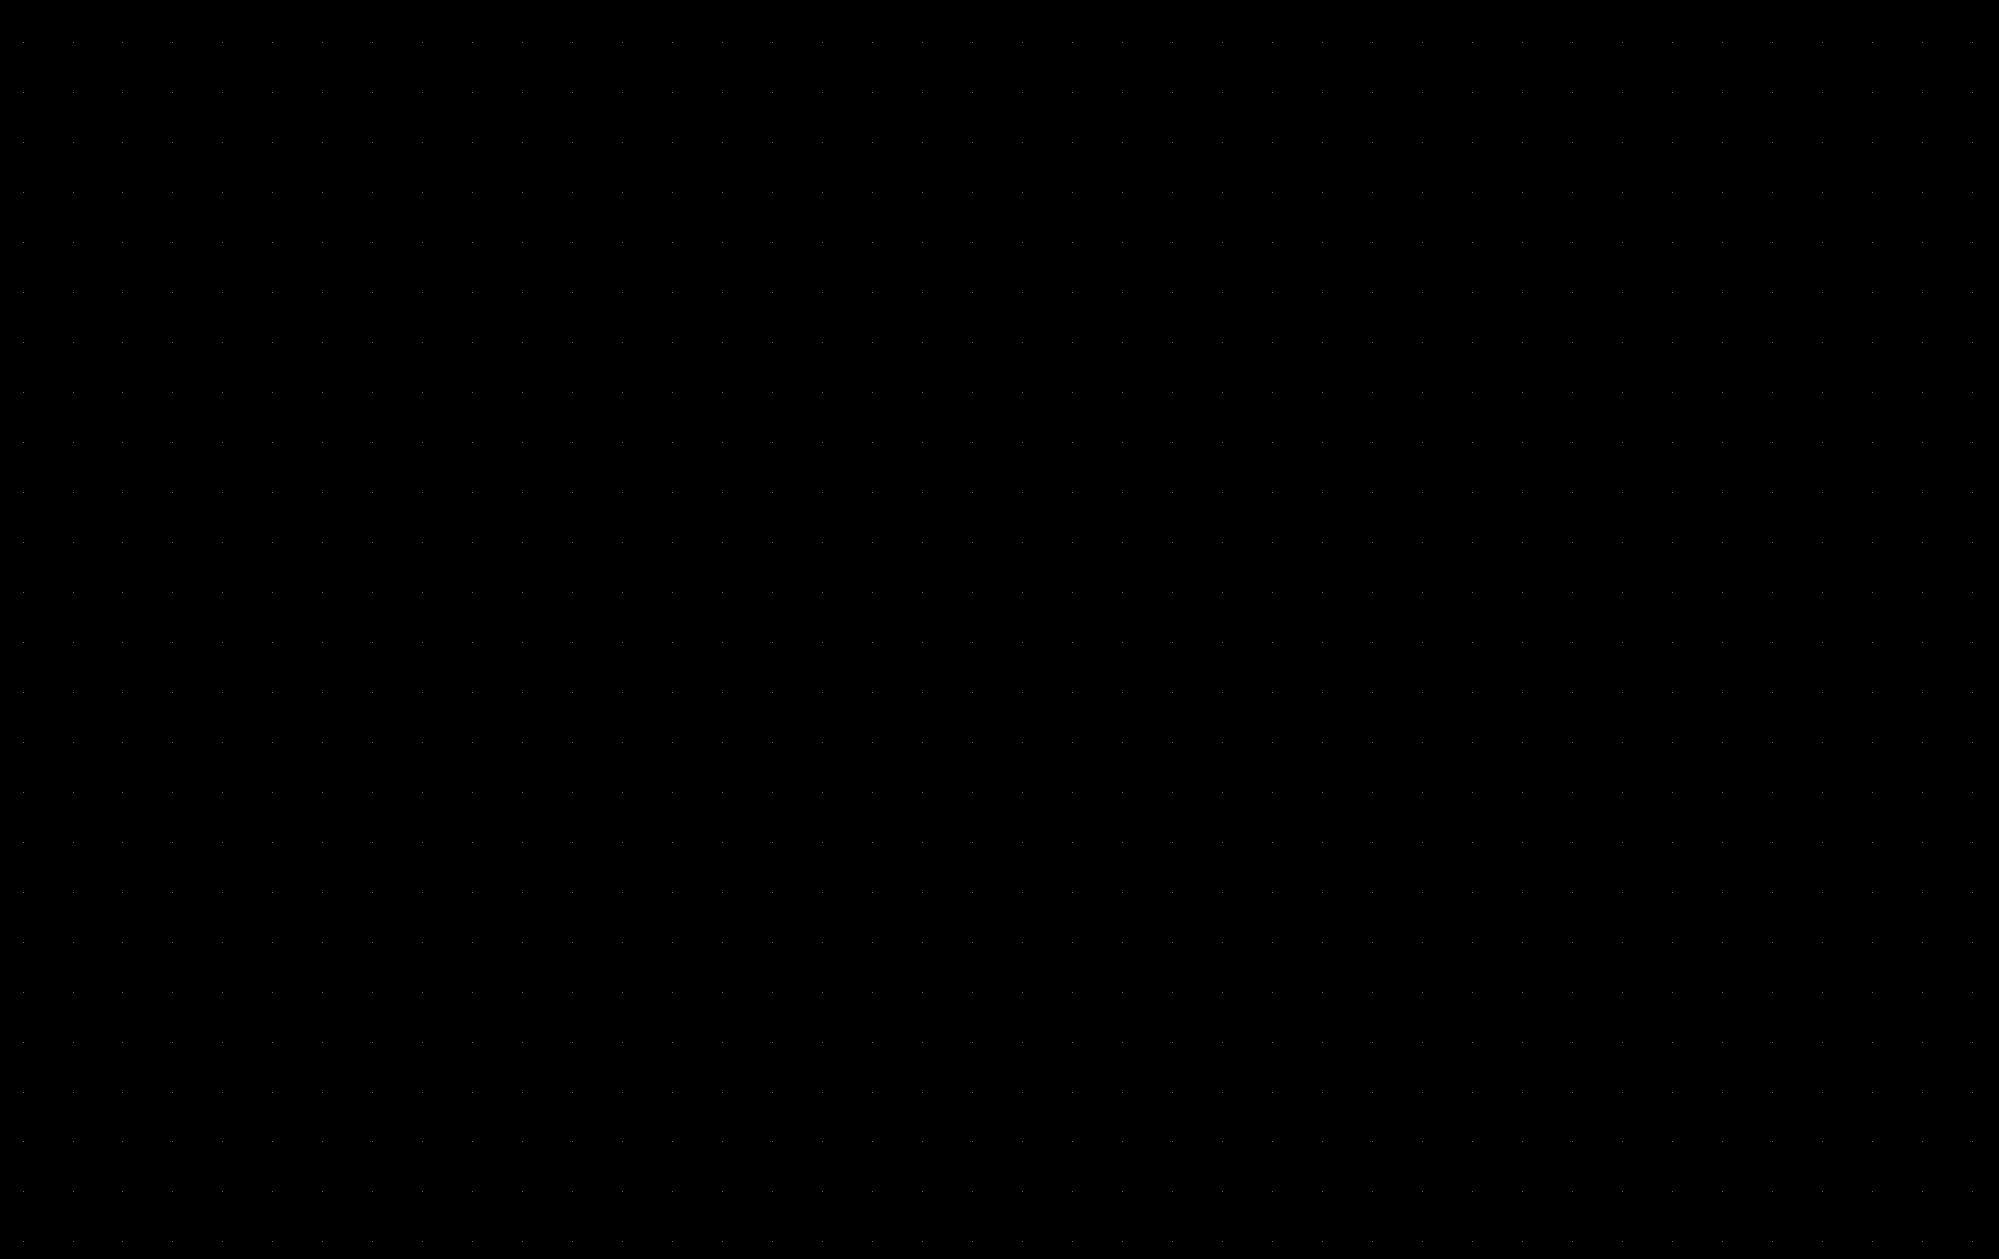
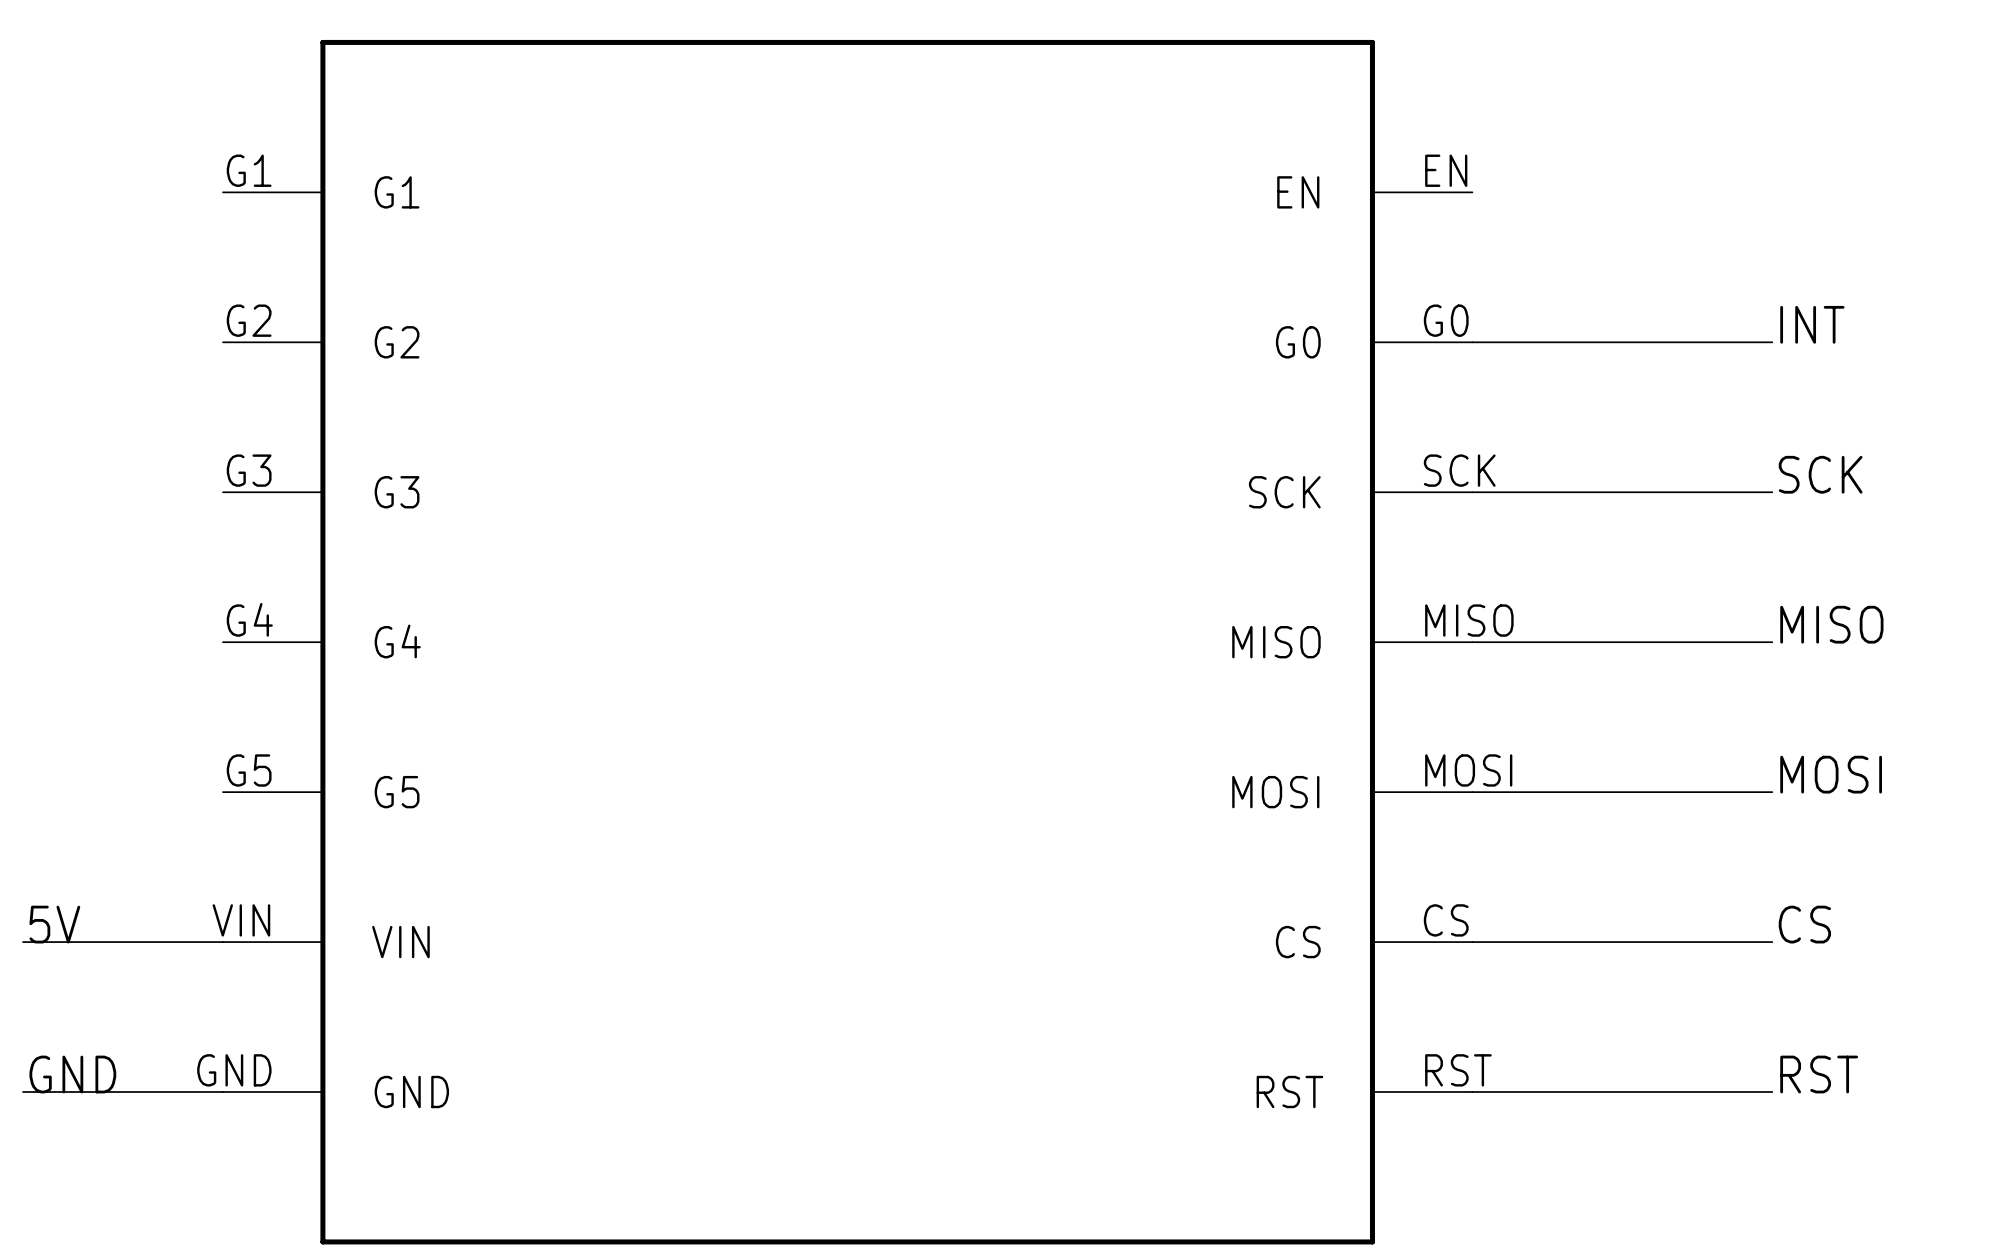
label: none -> INT (1812, 324)
wire: none -> (1472, 342) (1772, 342)
label: none -> SCK (1820, 474)
wire: none -> (1472, 492) (1772, 492)
label: none -> MISO (1831, 624)
part: none -> (847, 642)
wire: none -> (1472, 642) (1772, 642)
label: none -> MOSI (1831, 774)
wire: none -> (1472, 792) (1772, 792)
label: none -> 5V (54, 924)
label: none -> CS (1804, 924)
wire: none -> (23, 942) (222, 942)
wire: none -> (1472, 942) (1772, 942)
label: none -> GND (72, 1074)
label: none -> RST (1819, 1074)
wire: none -> (23, 1092) (222, 1092)
wire: none -> (1472, 1092) (1772, 1092)

